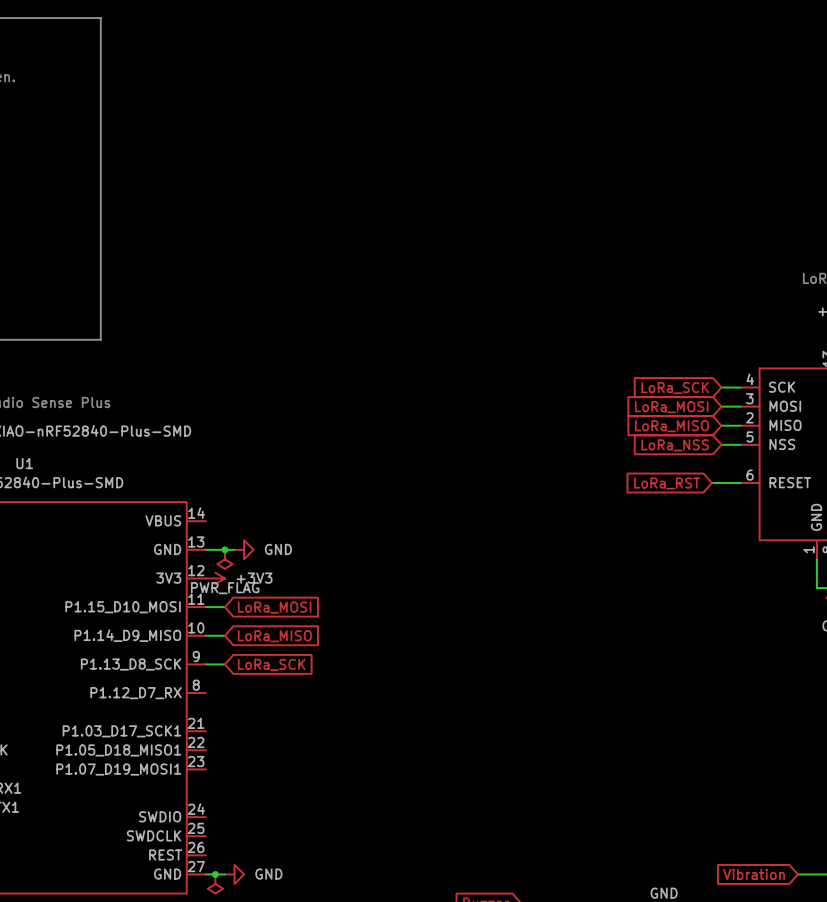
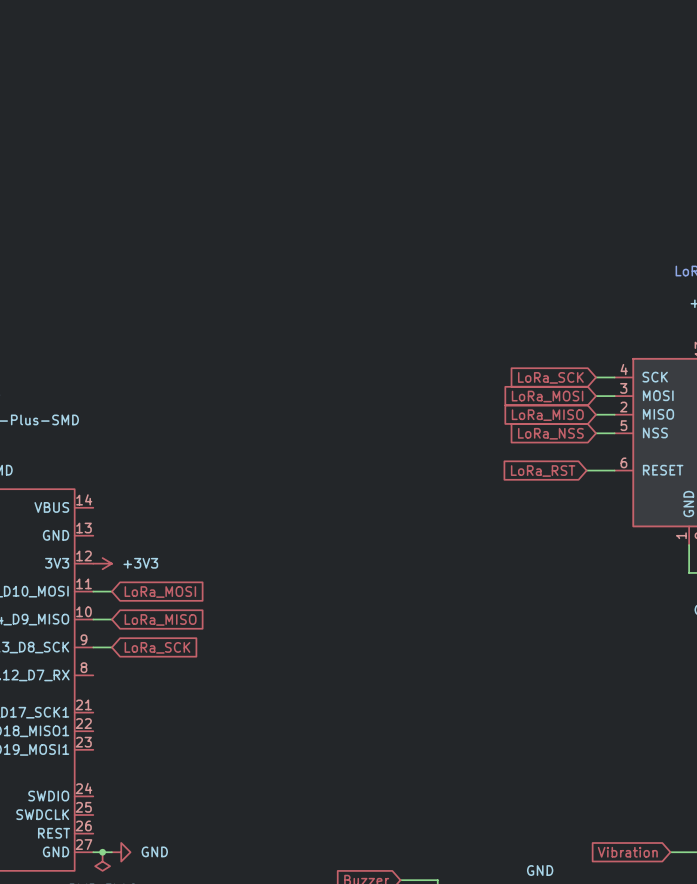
wire: (205, 549) (234, 549) -> none
junction: (224, 549) -> none
power symbol: GND (244, 549) -> none
power symbol: PWR_FLAG (224, 559) -> none

